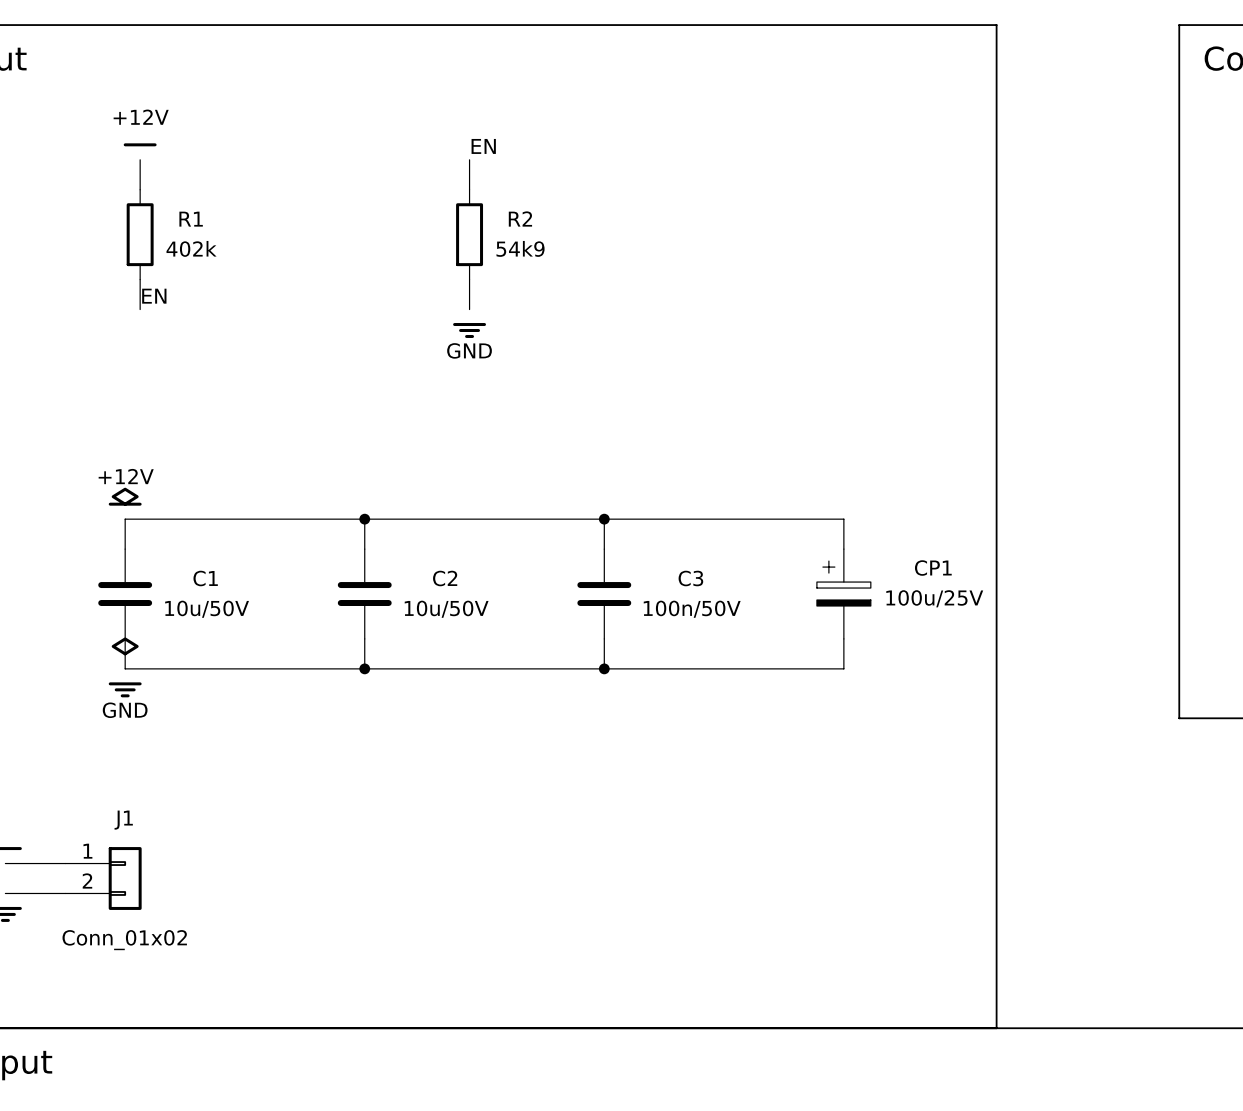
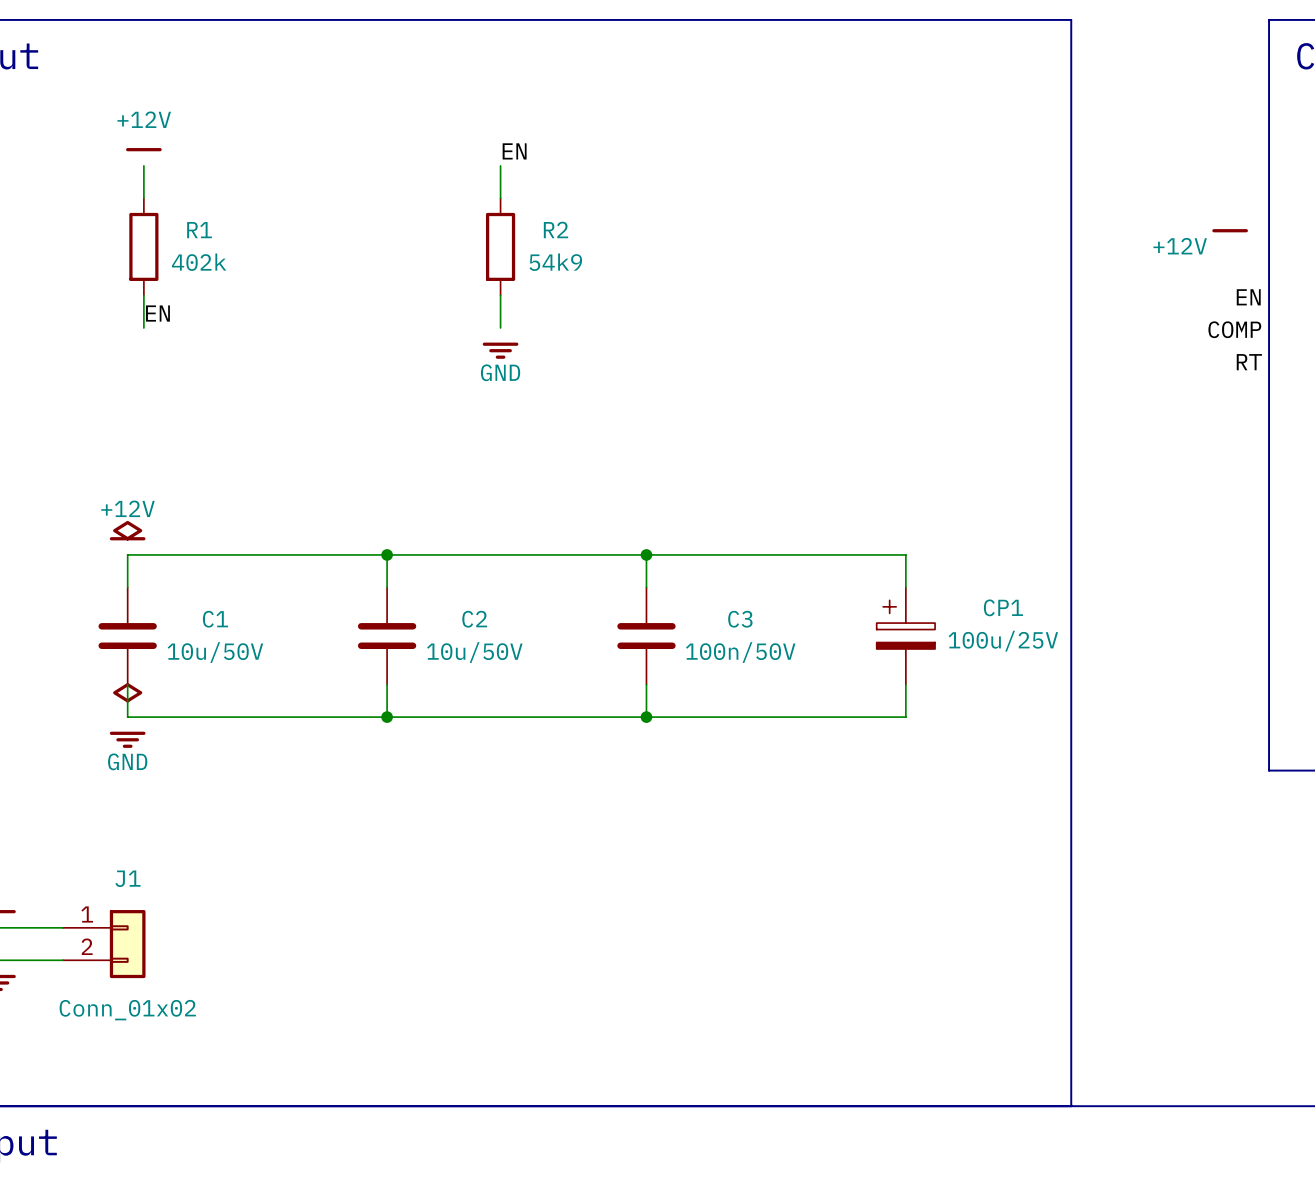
power symbol: none -> +12V (1230, 230)
label: none -> EN (1248, 297)
label: none -> COMP (1234, 329)
label: none -> RT (1249, 362)

